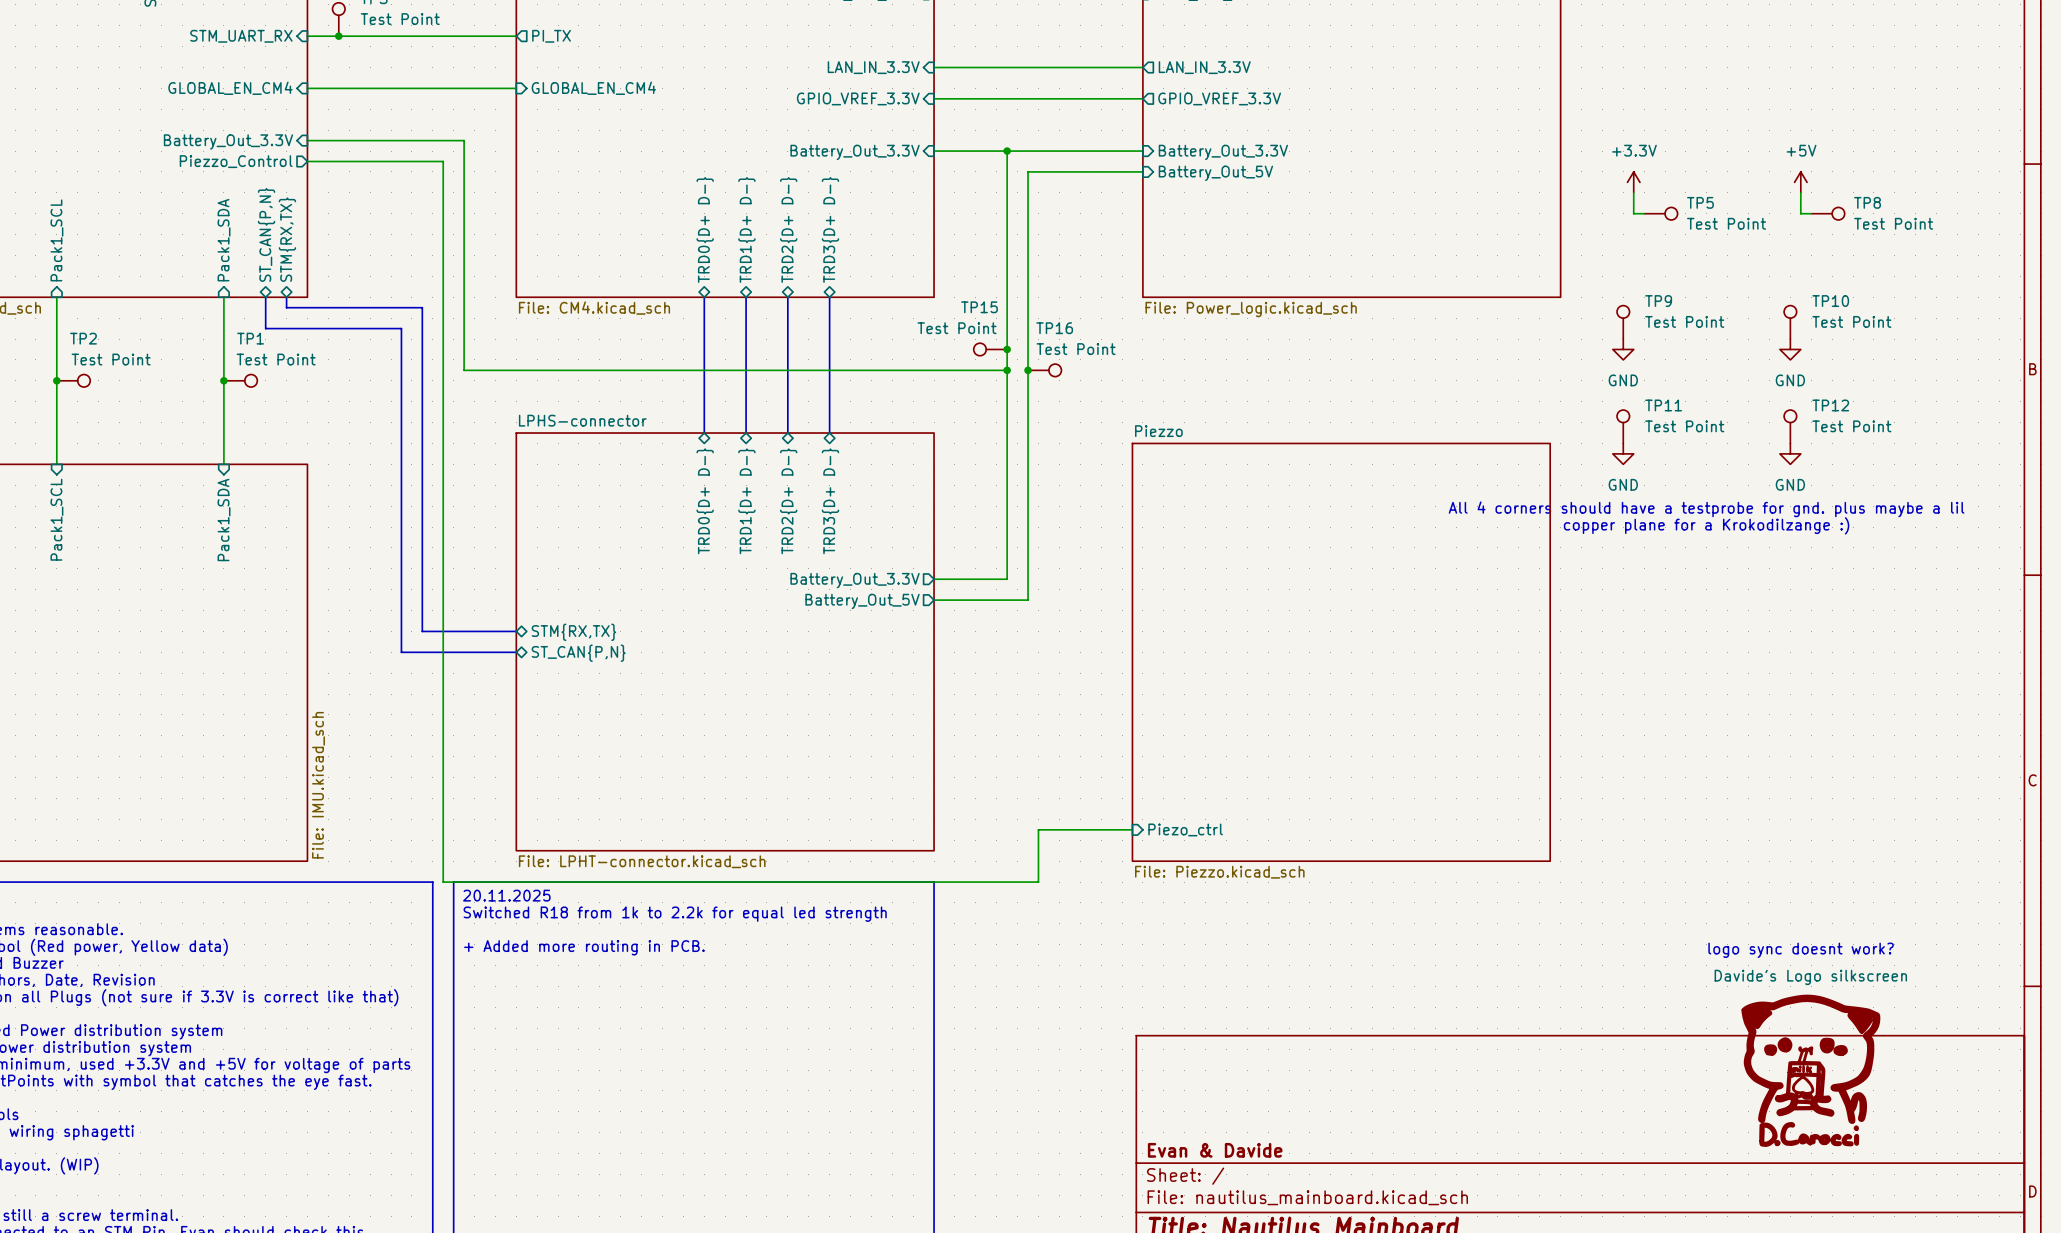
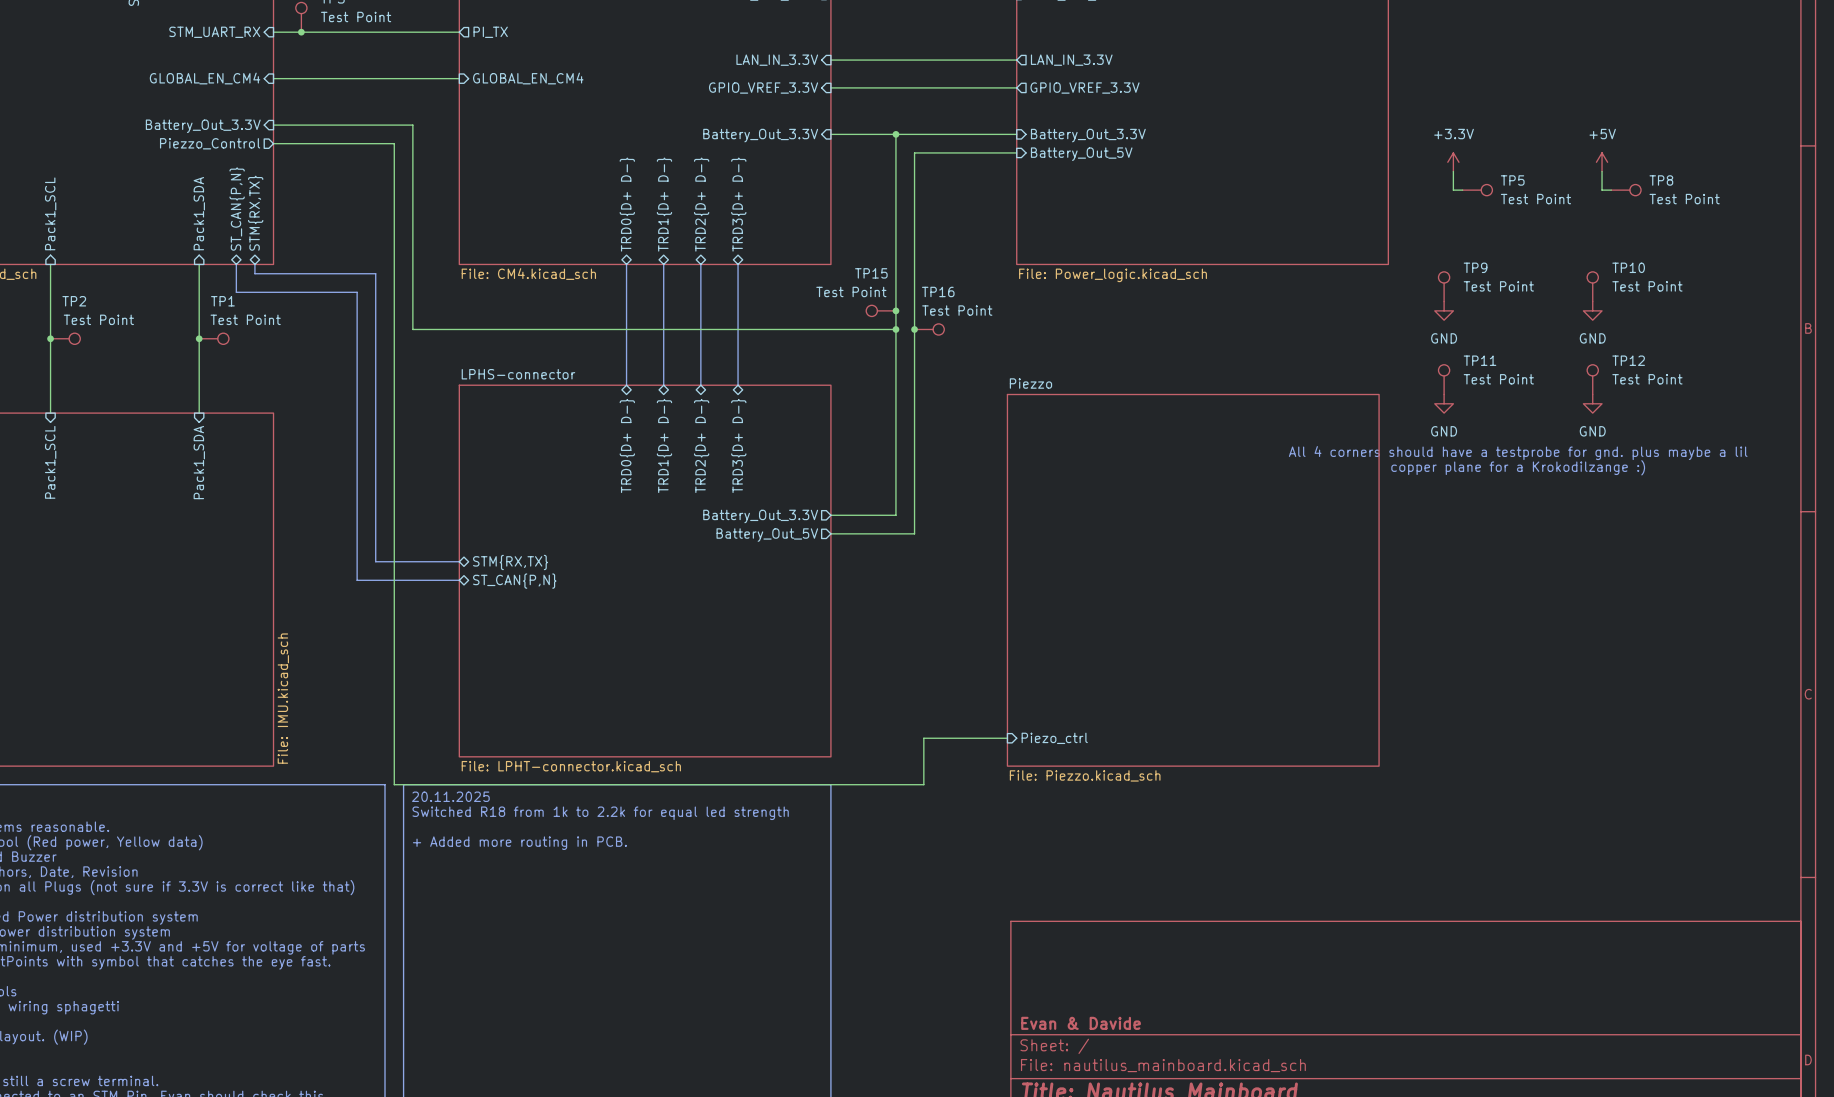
text: logo sync doesnt work? (1801, 950) -> none
power symbol: Davide's Logo silkscreen (1810, 1070) -> none

